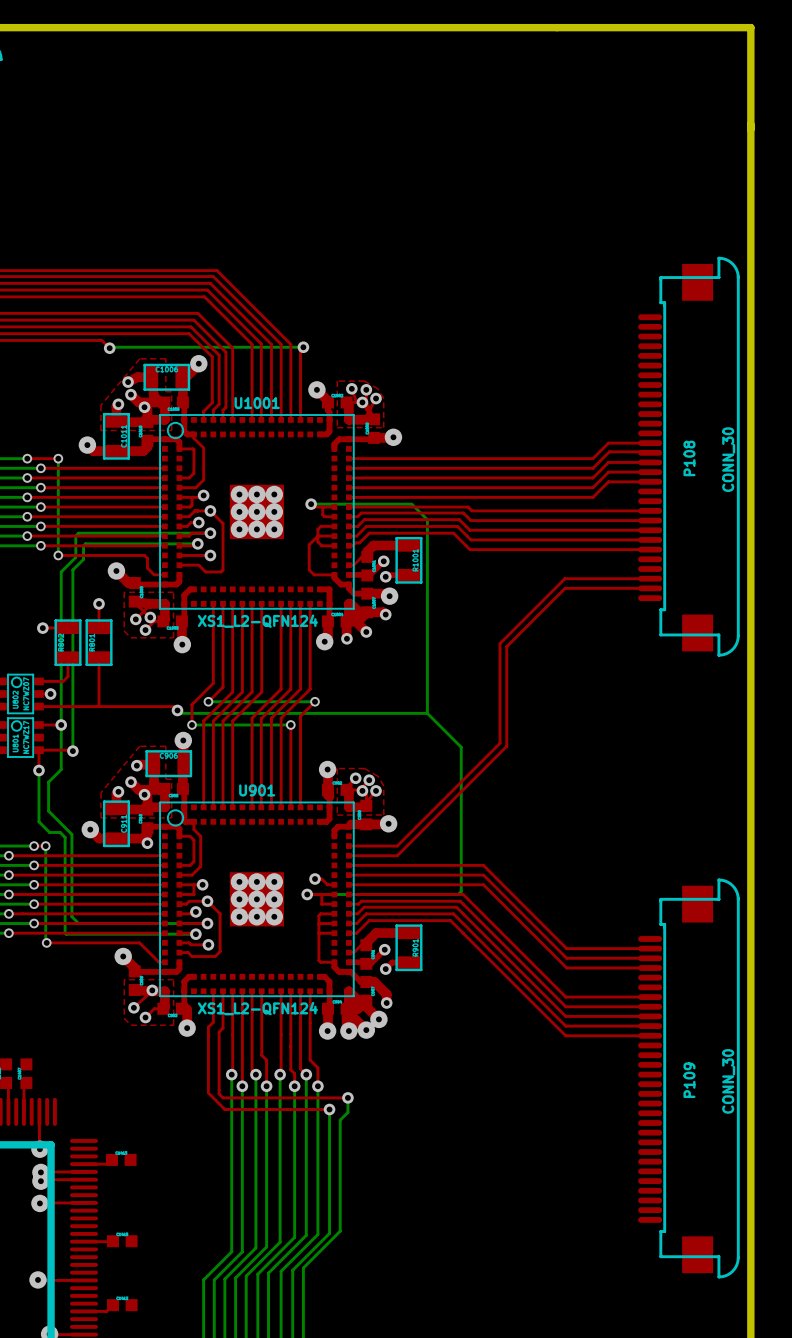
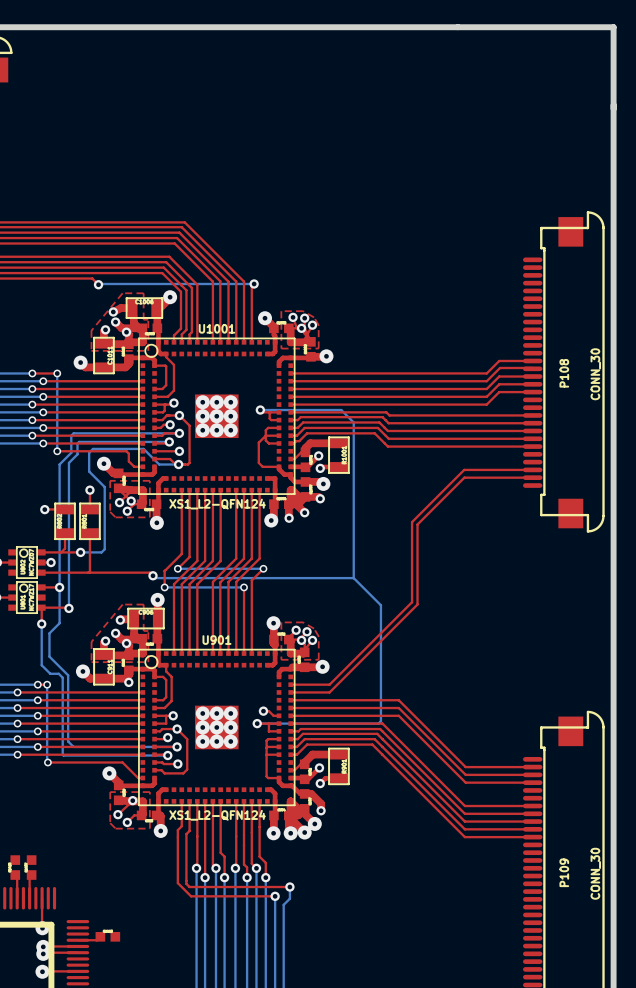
bottom track: none -> (178, 464) (159, 464) (143, 448) (93, 448) (89, 452) (89, 471) (104, 487) (104, 549) (101, 552) (80, 552)
via: none -> (178, 464)
top track: none -> (61, 552) (80, 552)
via: none -> (80, 552)

